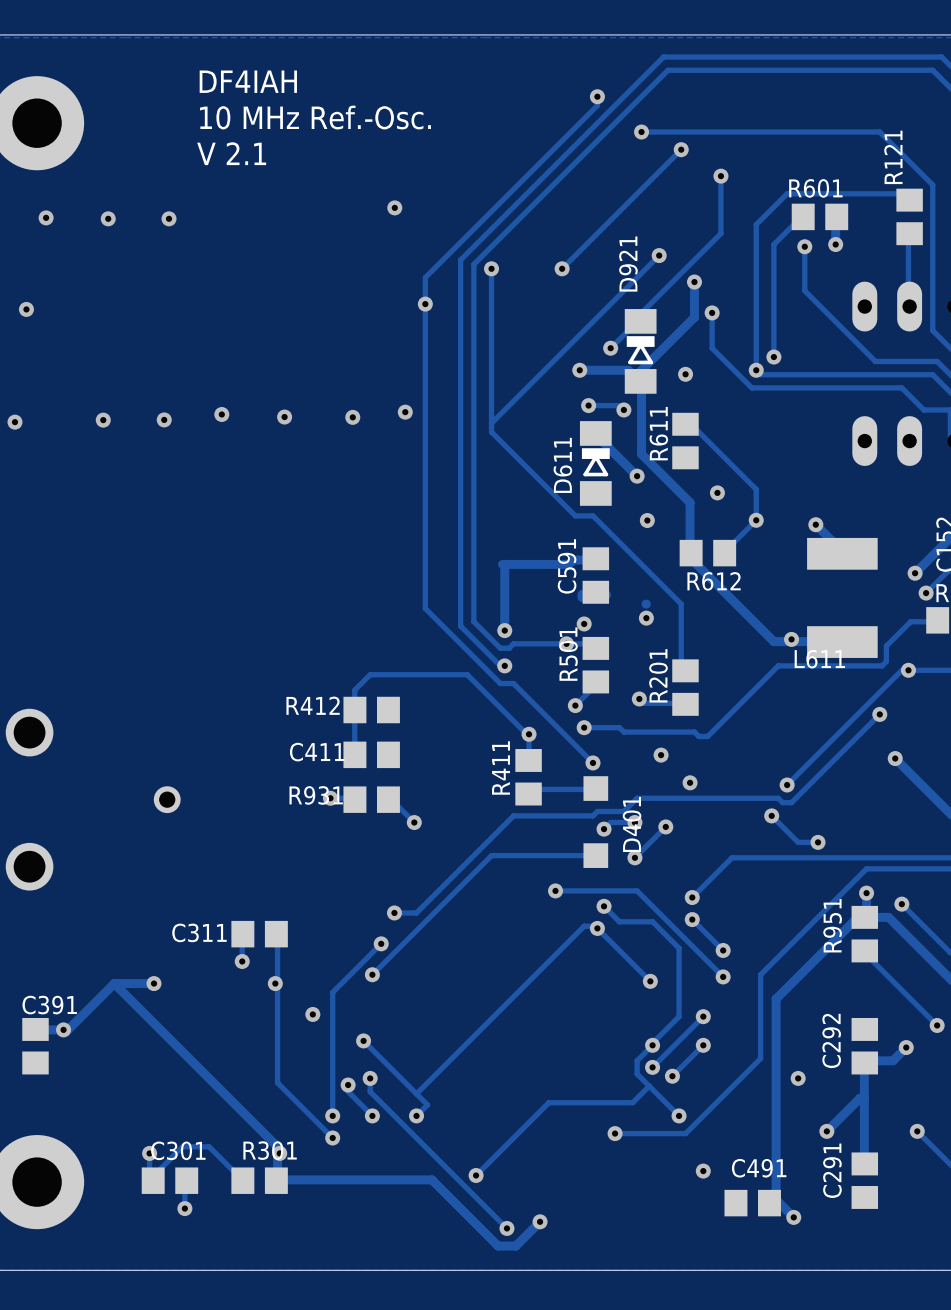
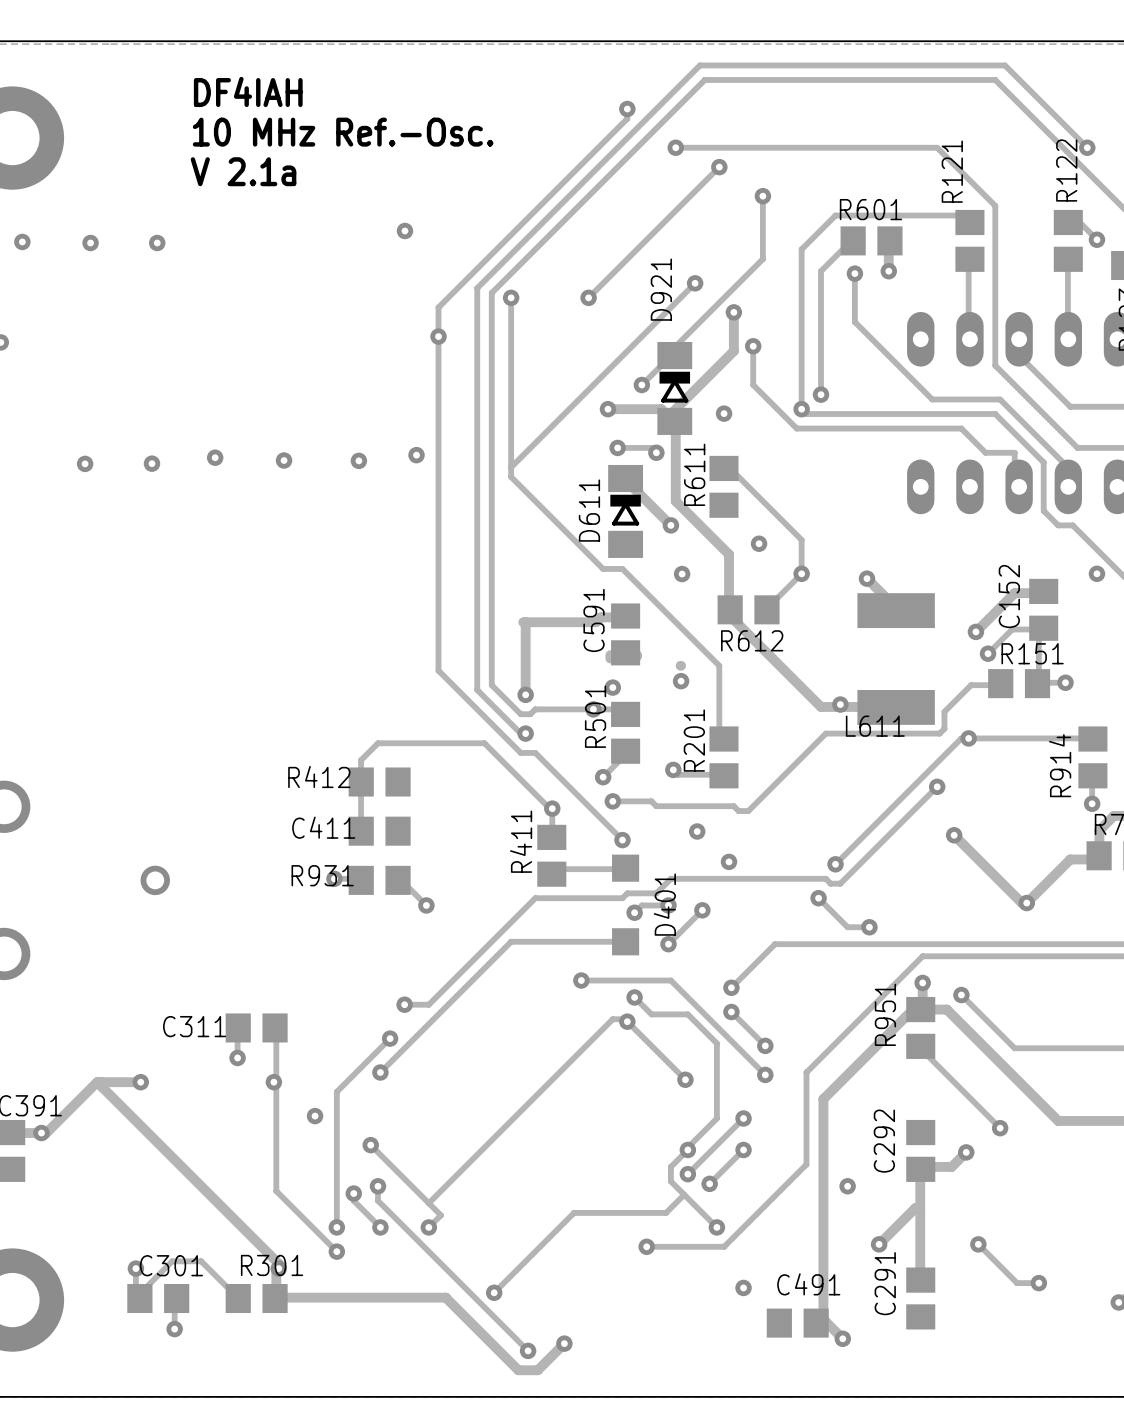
text: V 2.1 (231, 153) -> V 2.1a (243, 171)

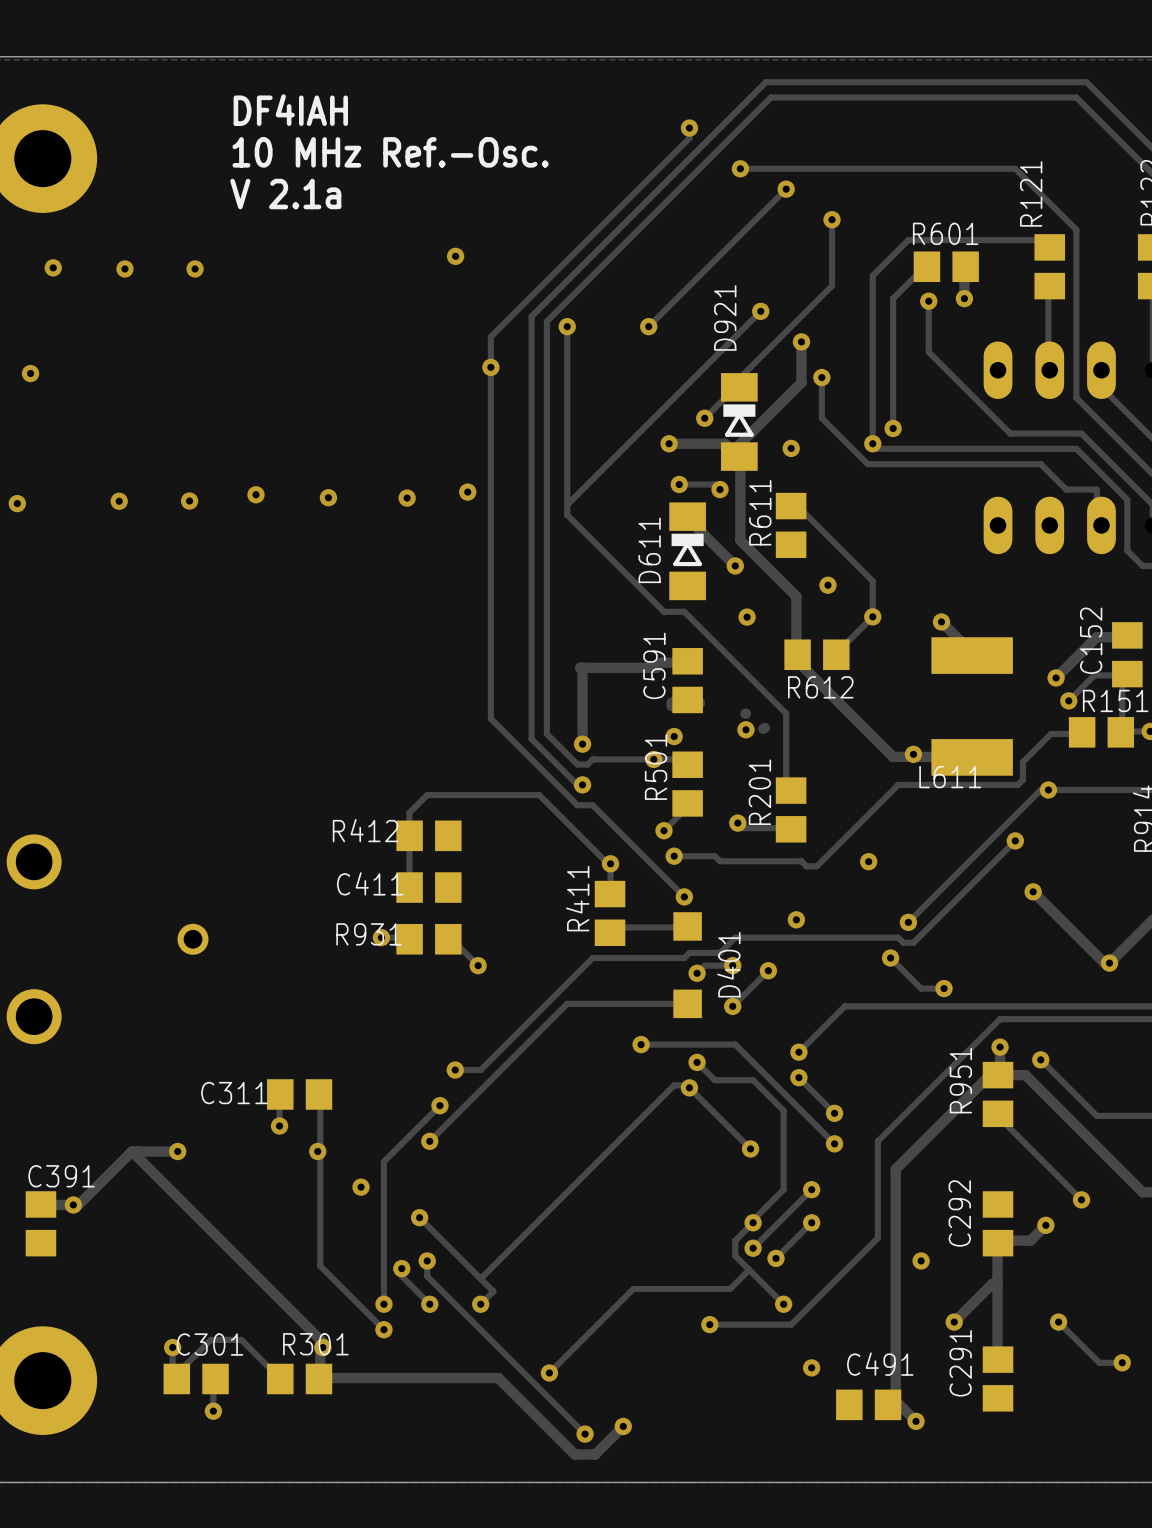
track: none -> (764, 727) (763, 728)
via position: (697, 831) -> (868, 861)

